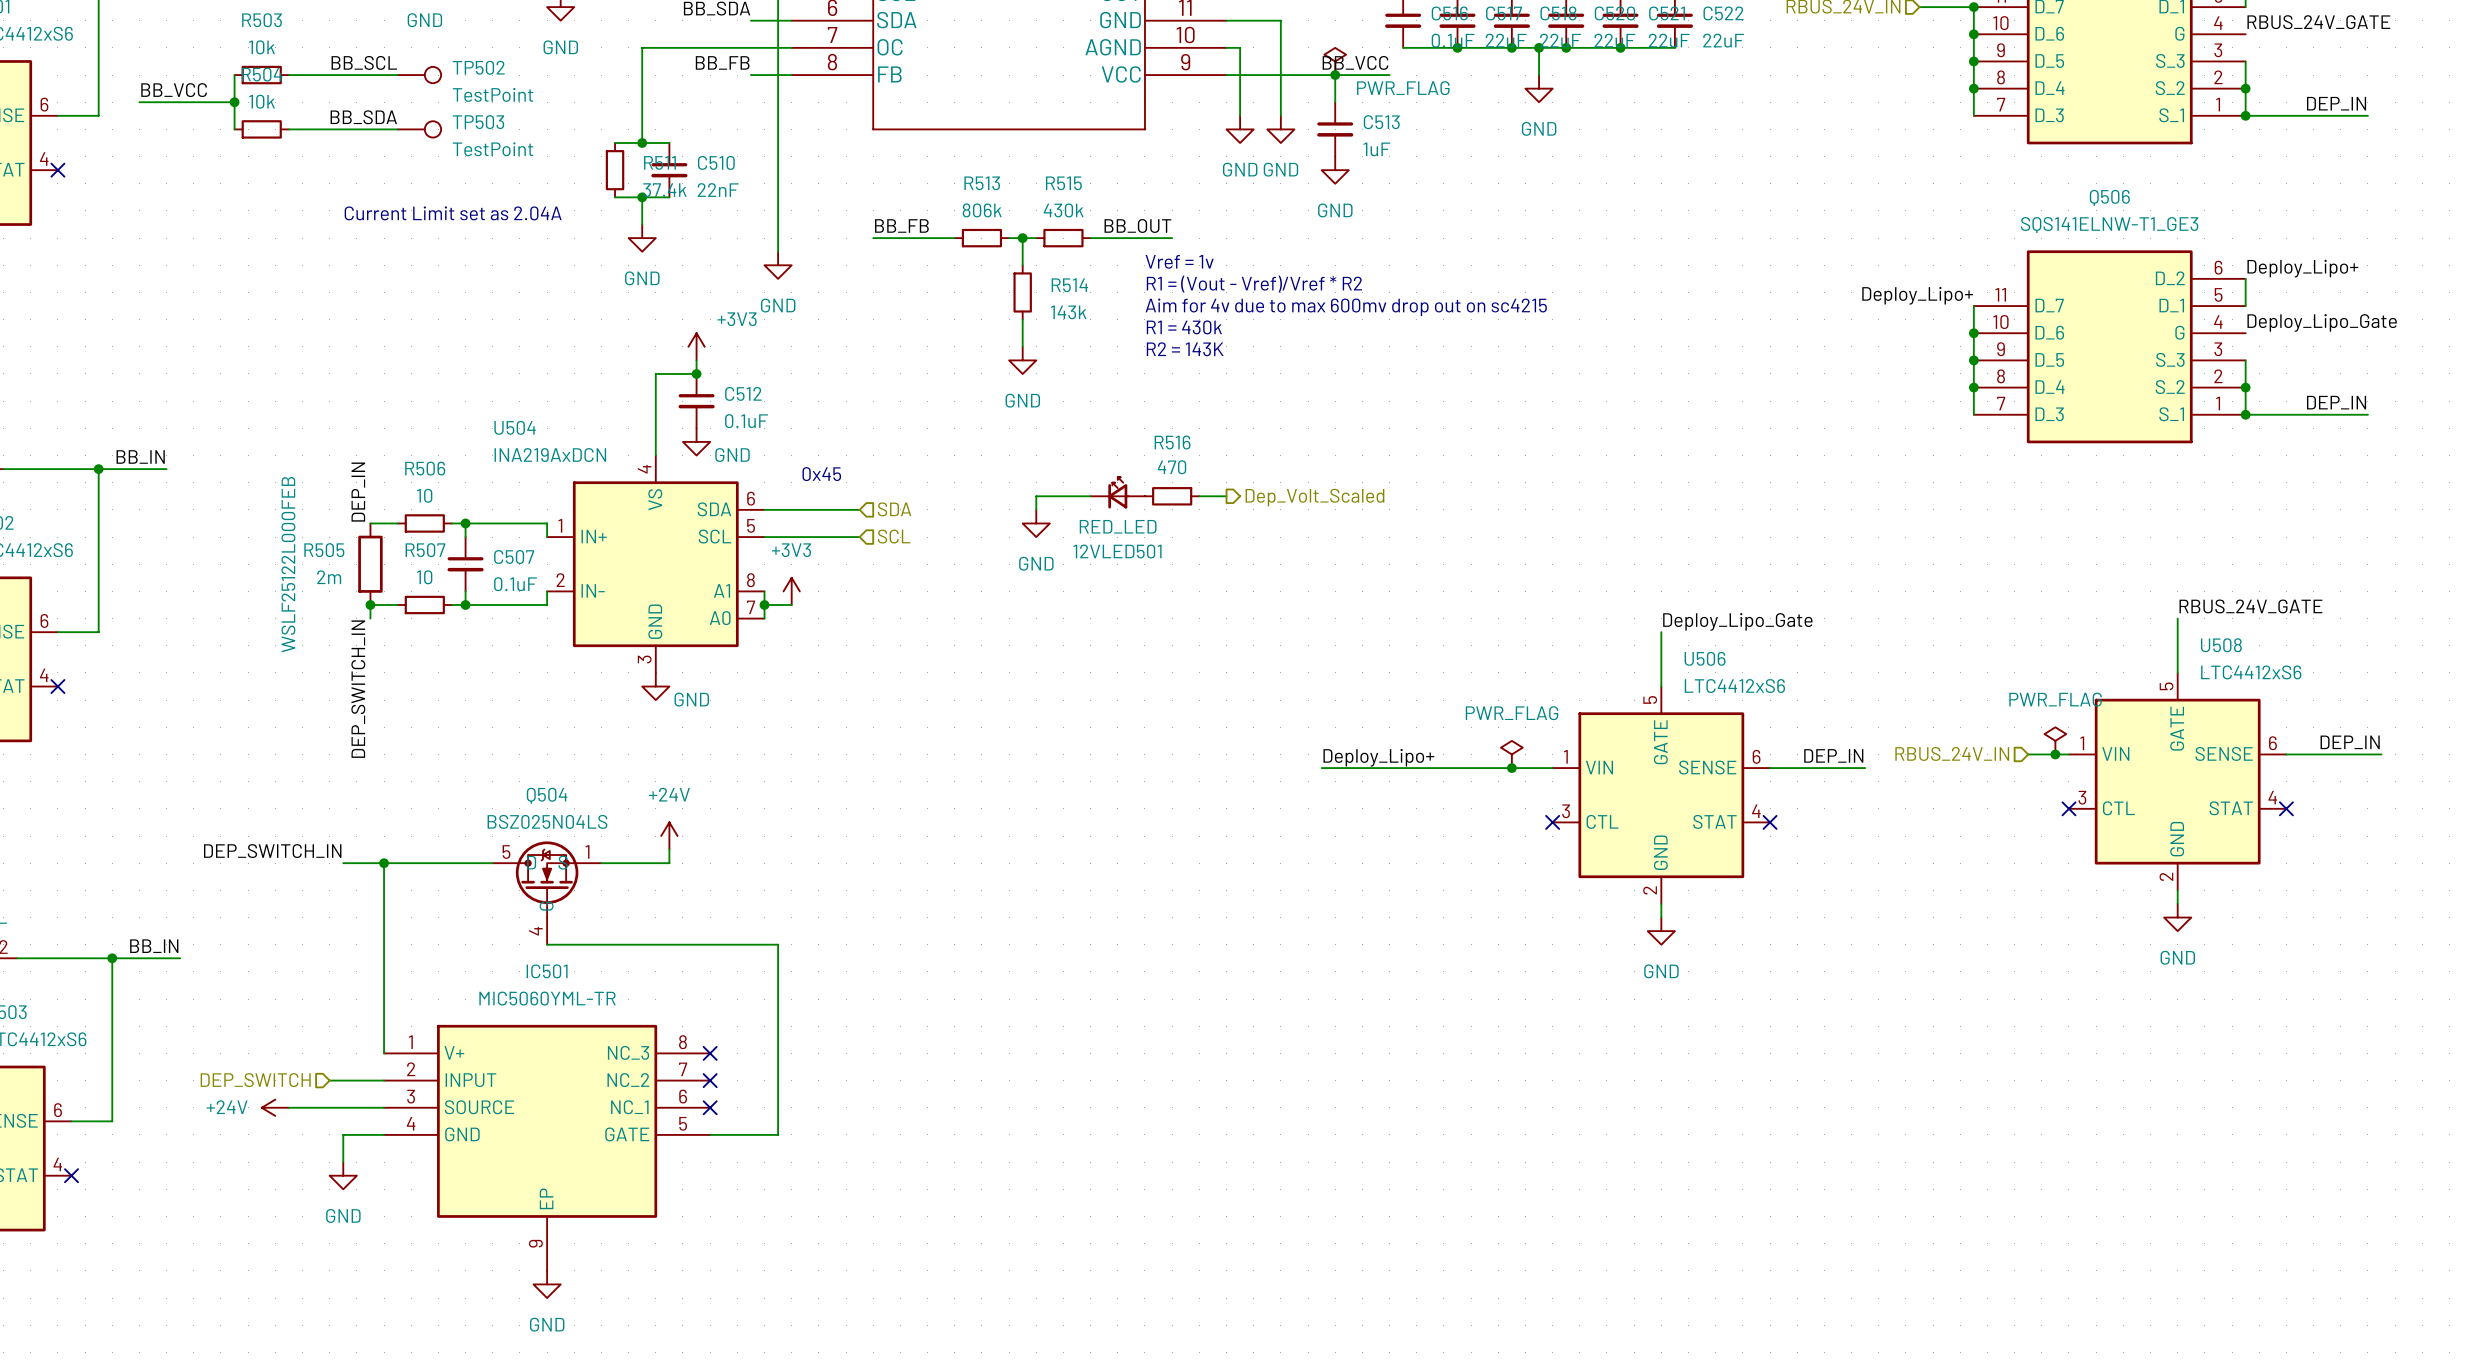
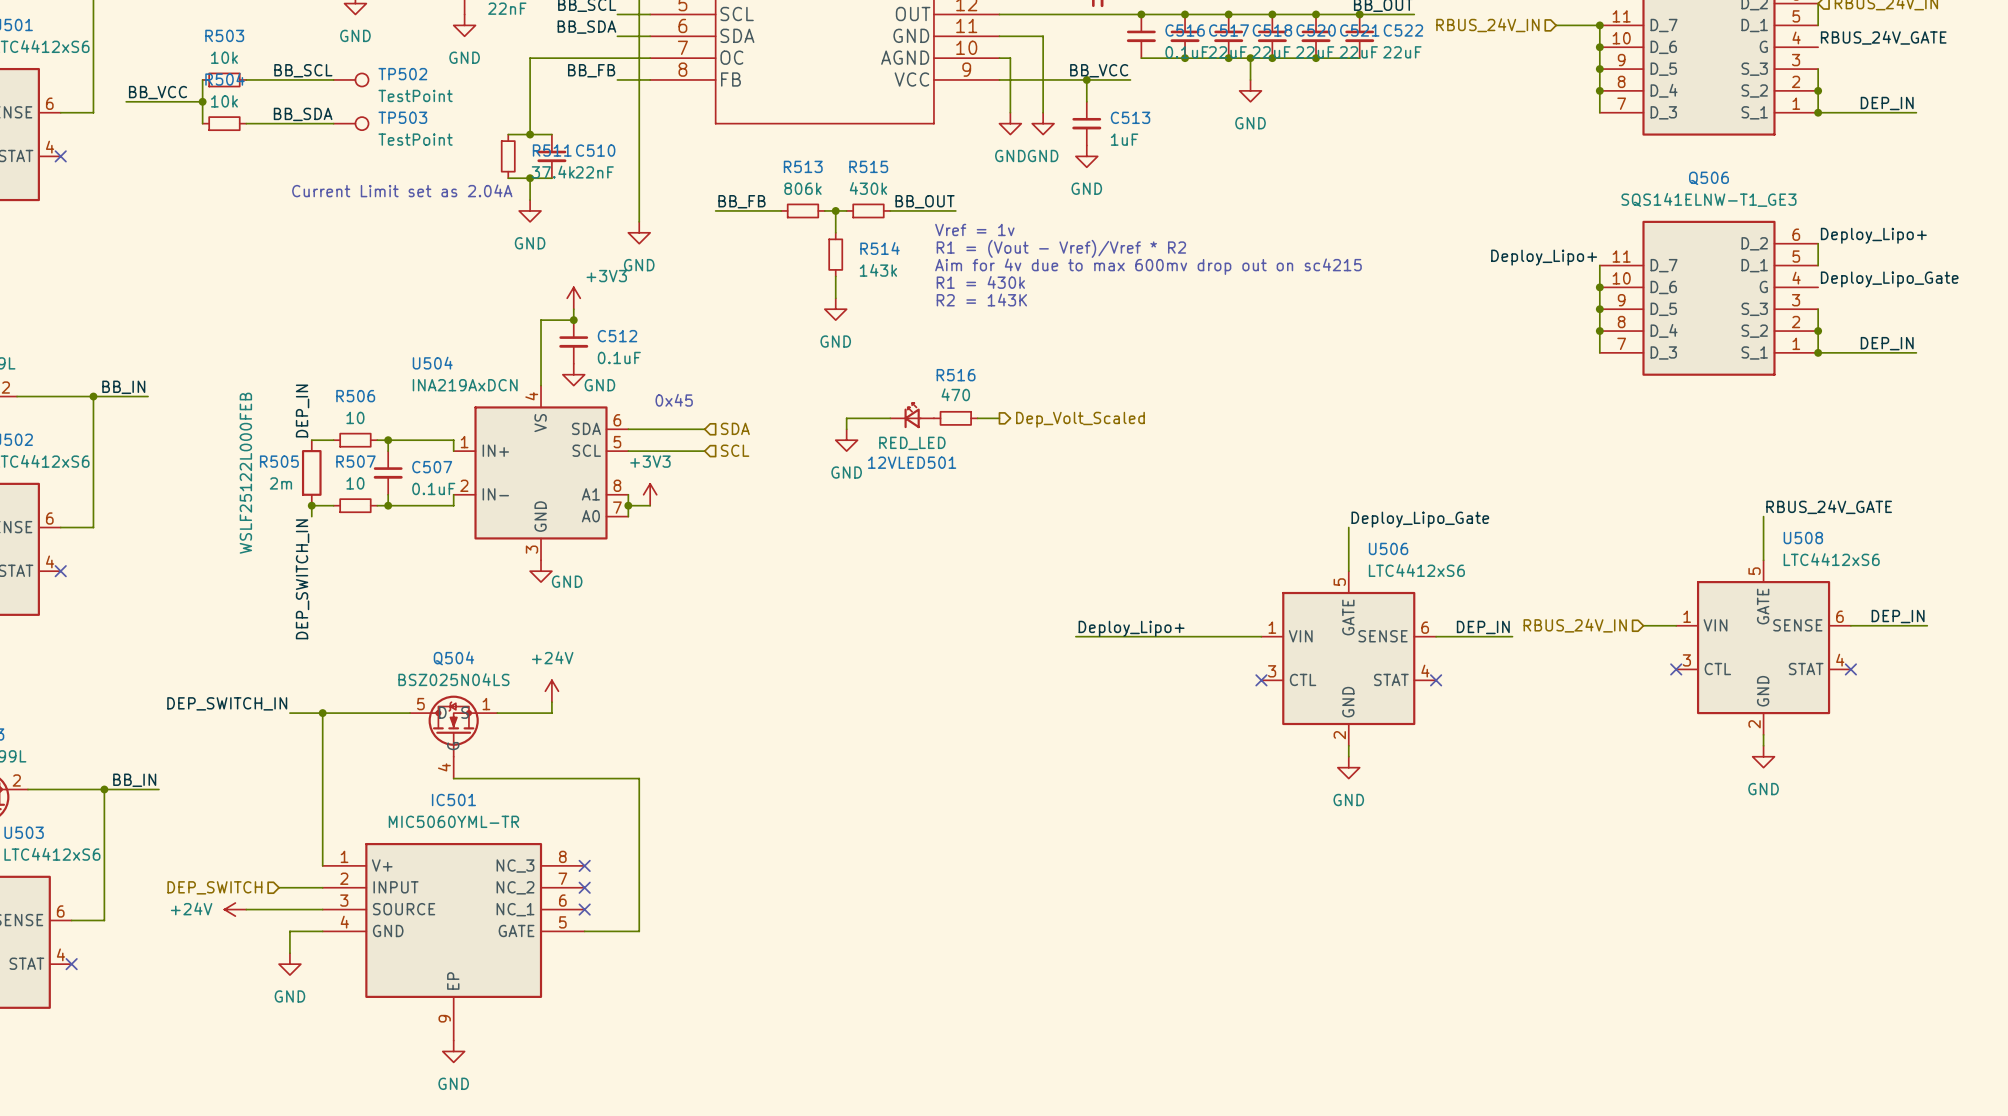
power symbol: PWR_FLAG (1335, 61) -> none
power symbol: PWR_FLAG (2055, 740) -> none
power symbol: PWR_FLAG (1511, 754) -> none
junction: (2055, 754) -> none
junction: (1511, 768) -> none

